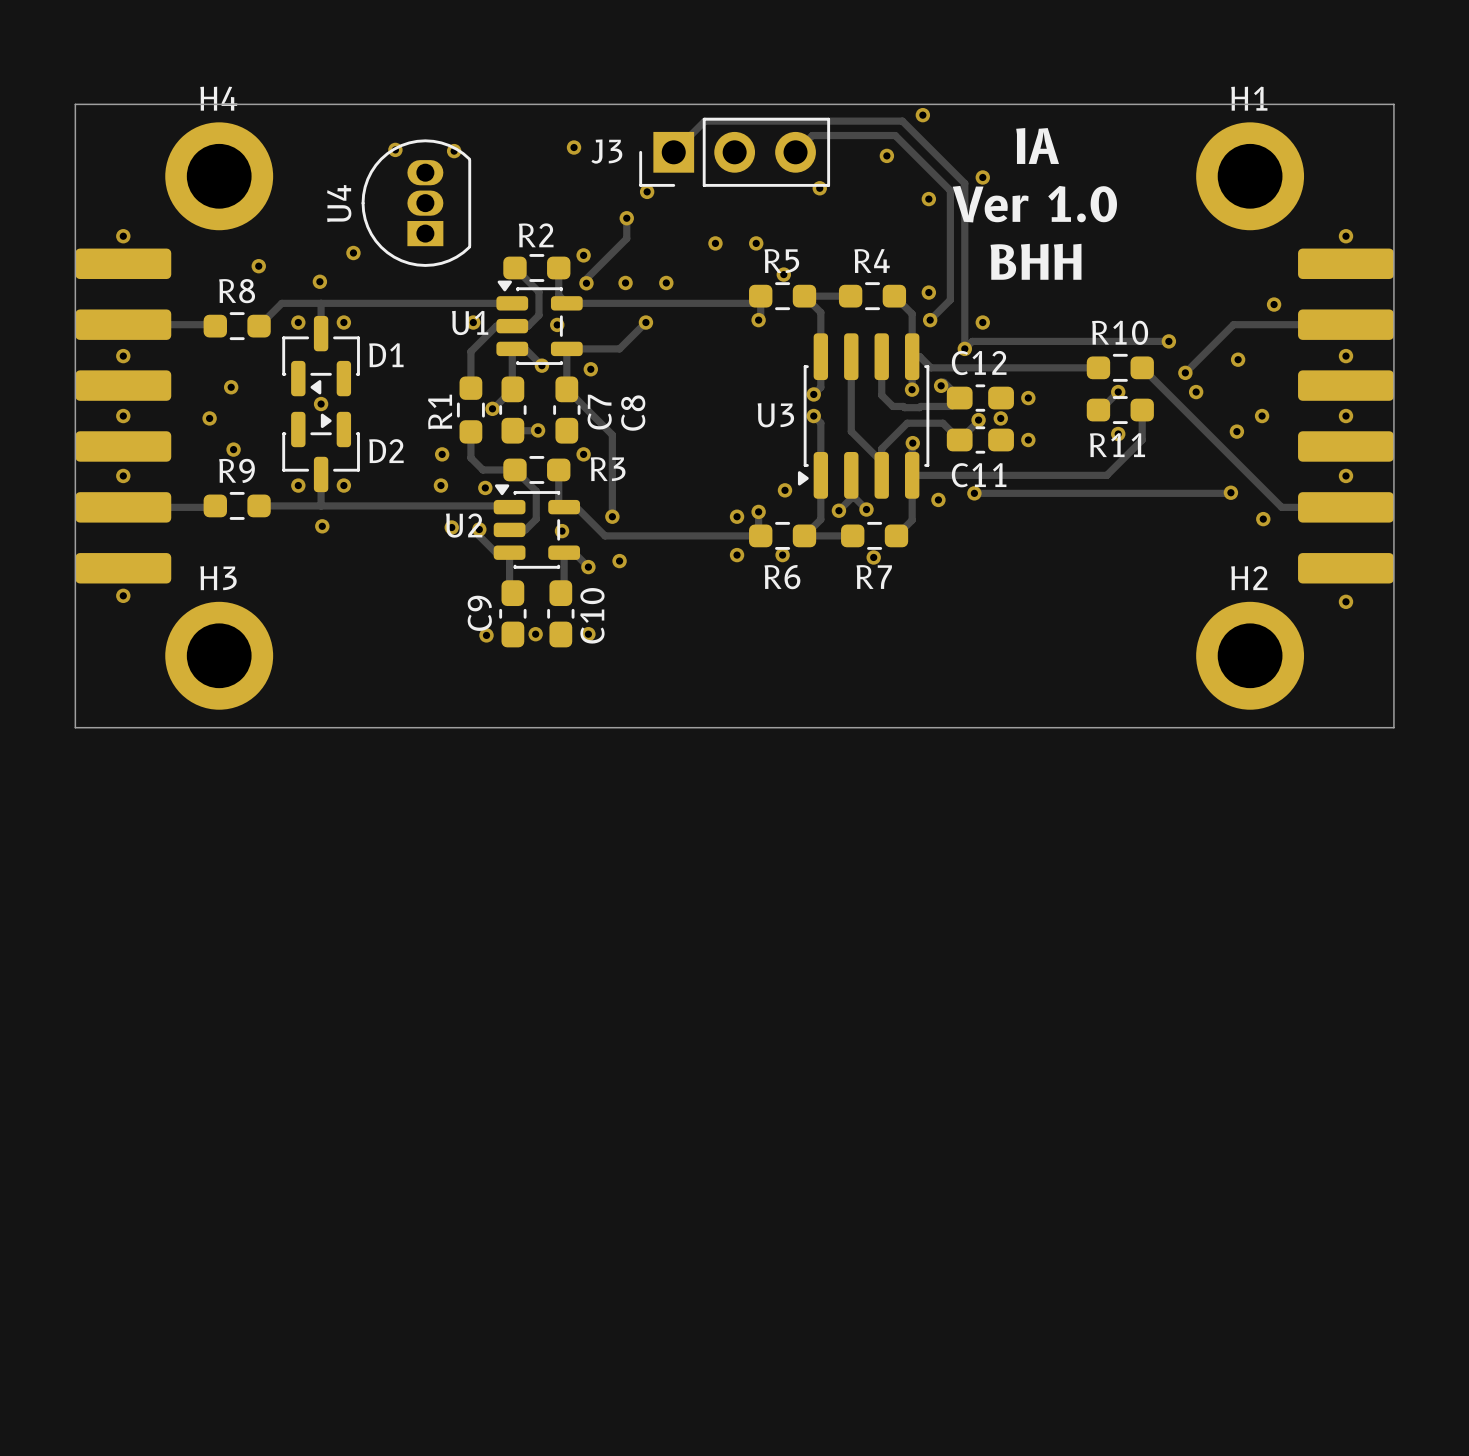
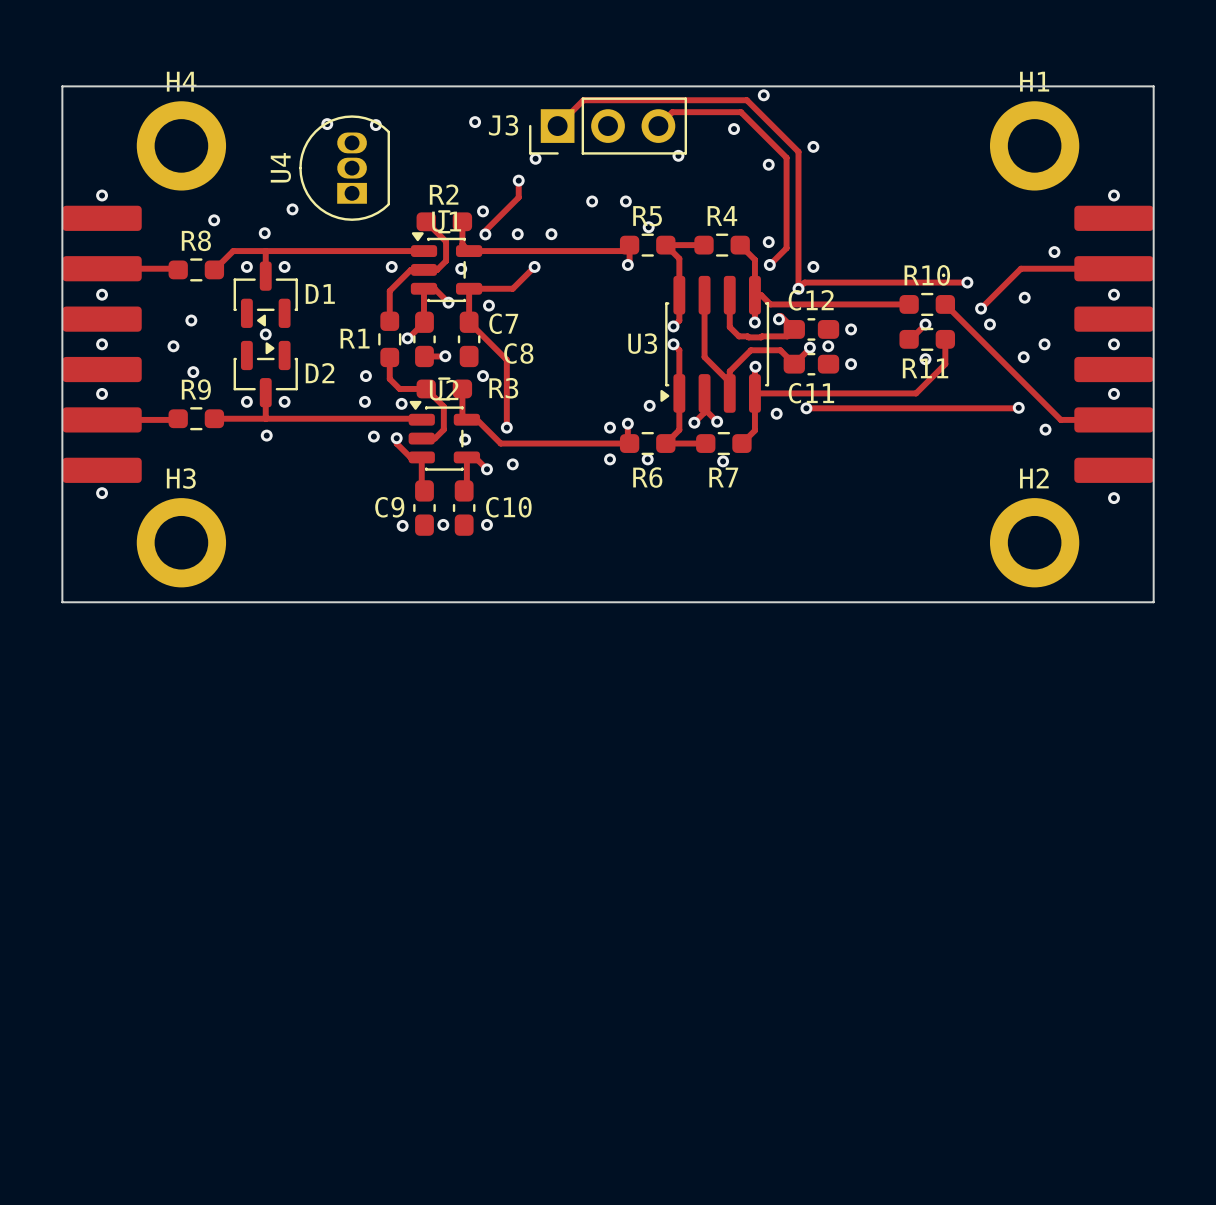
text: IA (1037, 146) -> none
text: Ver 1.0 (1034, 204) -> none
text: BHH (1035, 261) -> none
U1 name position: U1 (470, 322) -> U1 (446, 221)
R1 name rotation: 0° (440, 411) -> 90° clockwise (355, 338)
C7 name rotation: 0° (599, 412) -> 90° clockwise (503, 323)
C8 name rotation: 0° (633, 413) -> 90° clockwise (518, 353)
U2 name position: U2 (464, 525) -> U2 (444, 390)
C9 name rotation: 0° (479, 613) -> 90° clockwise (389, 507)
C10 name rotation: 0° (592, 615) -> 90° clockwise (508, 507)

